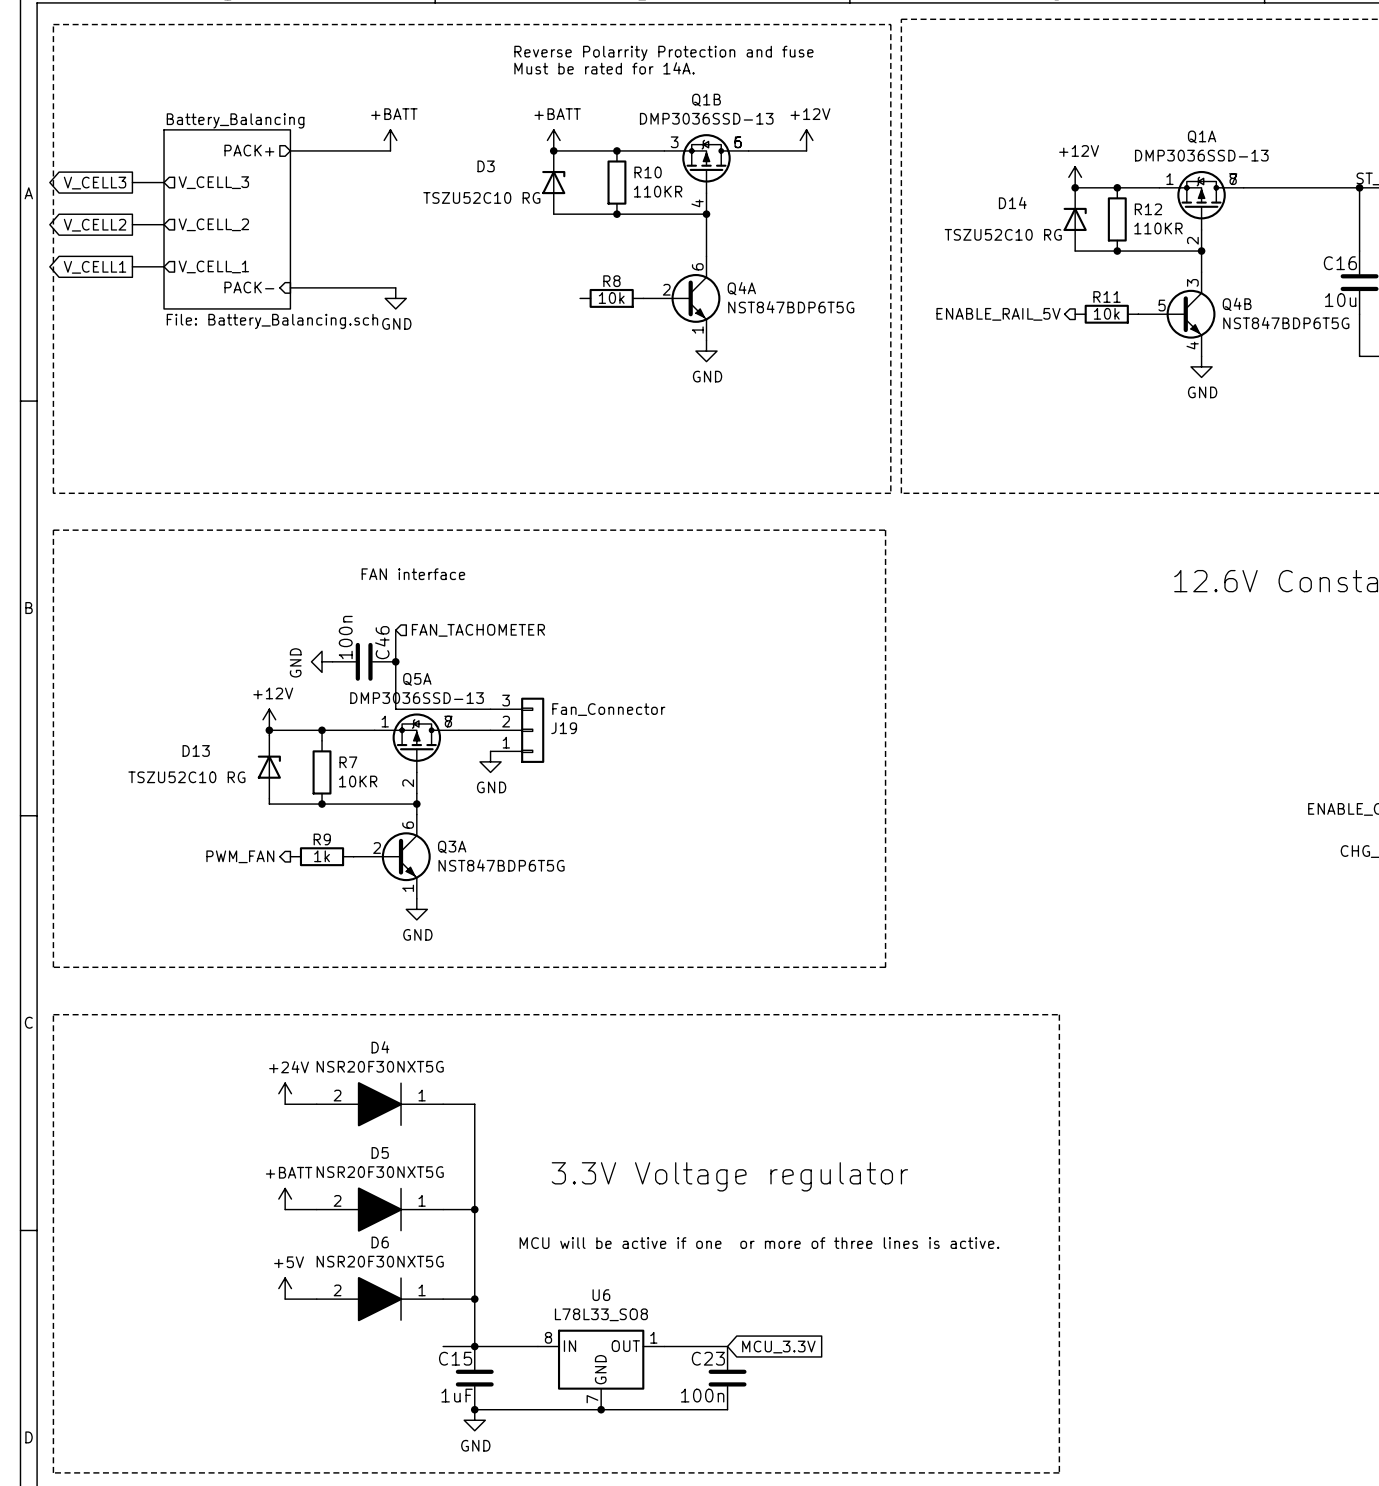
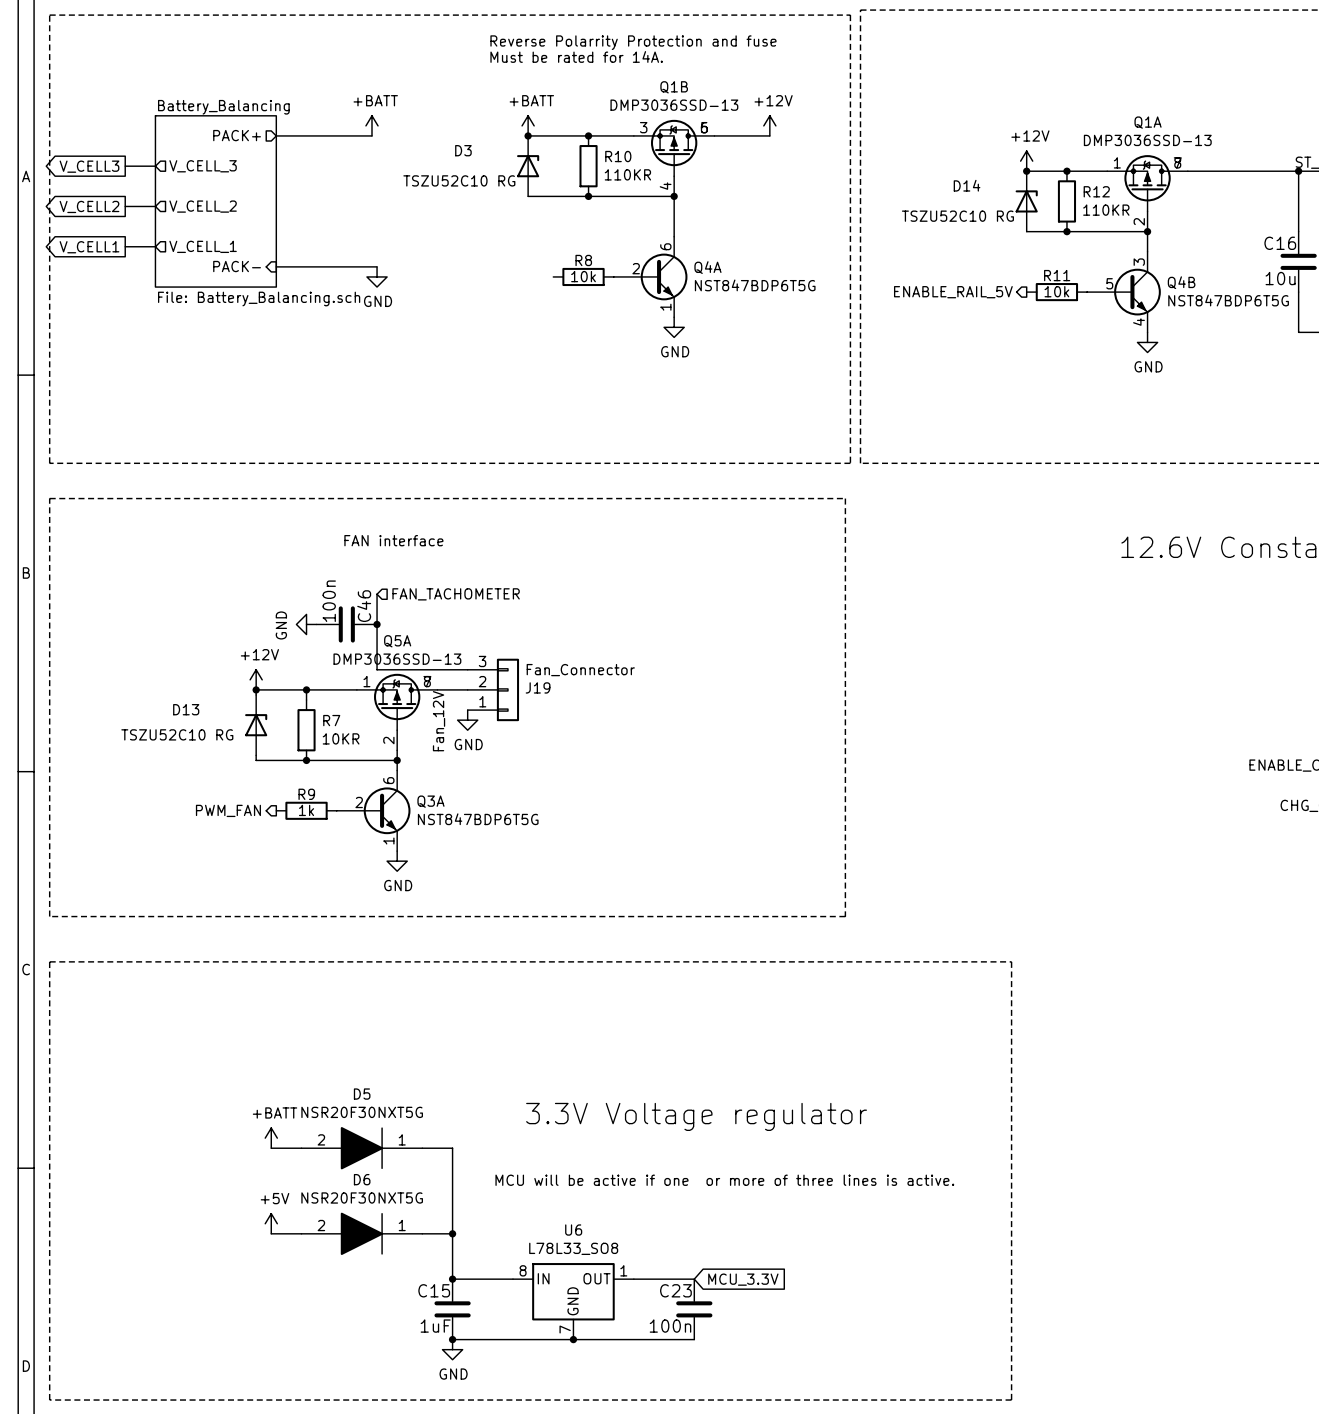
label: none -> Fan_12V (439, 721)
power symbol: +24V (285, 1093) -> none
wire: (285, 1104) (316, 1104) -> none
D4: NSR20F30NXT5G (379, 1104) -> none
wire: (443, 1104) (474, 1104) (474, 1209) -> none
junction: (474, 1209) -> none
wire: (443, 1346) (474, 1346) -> none

